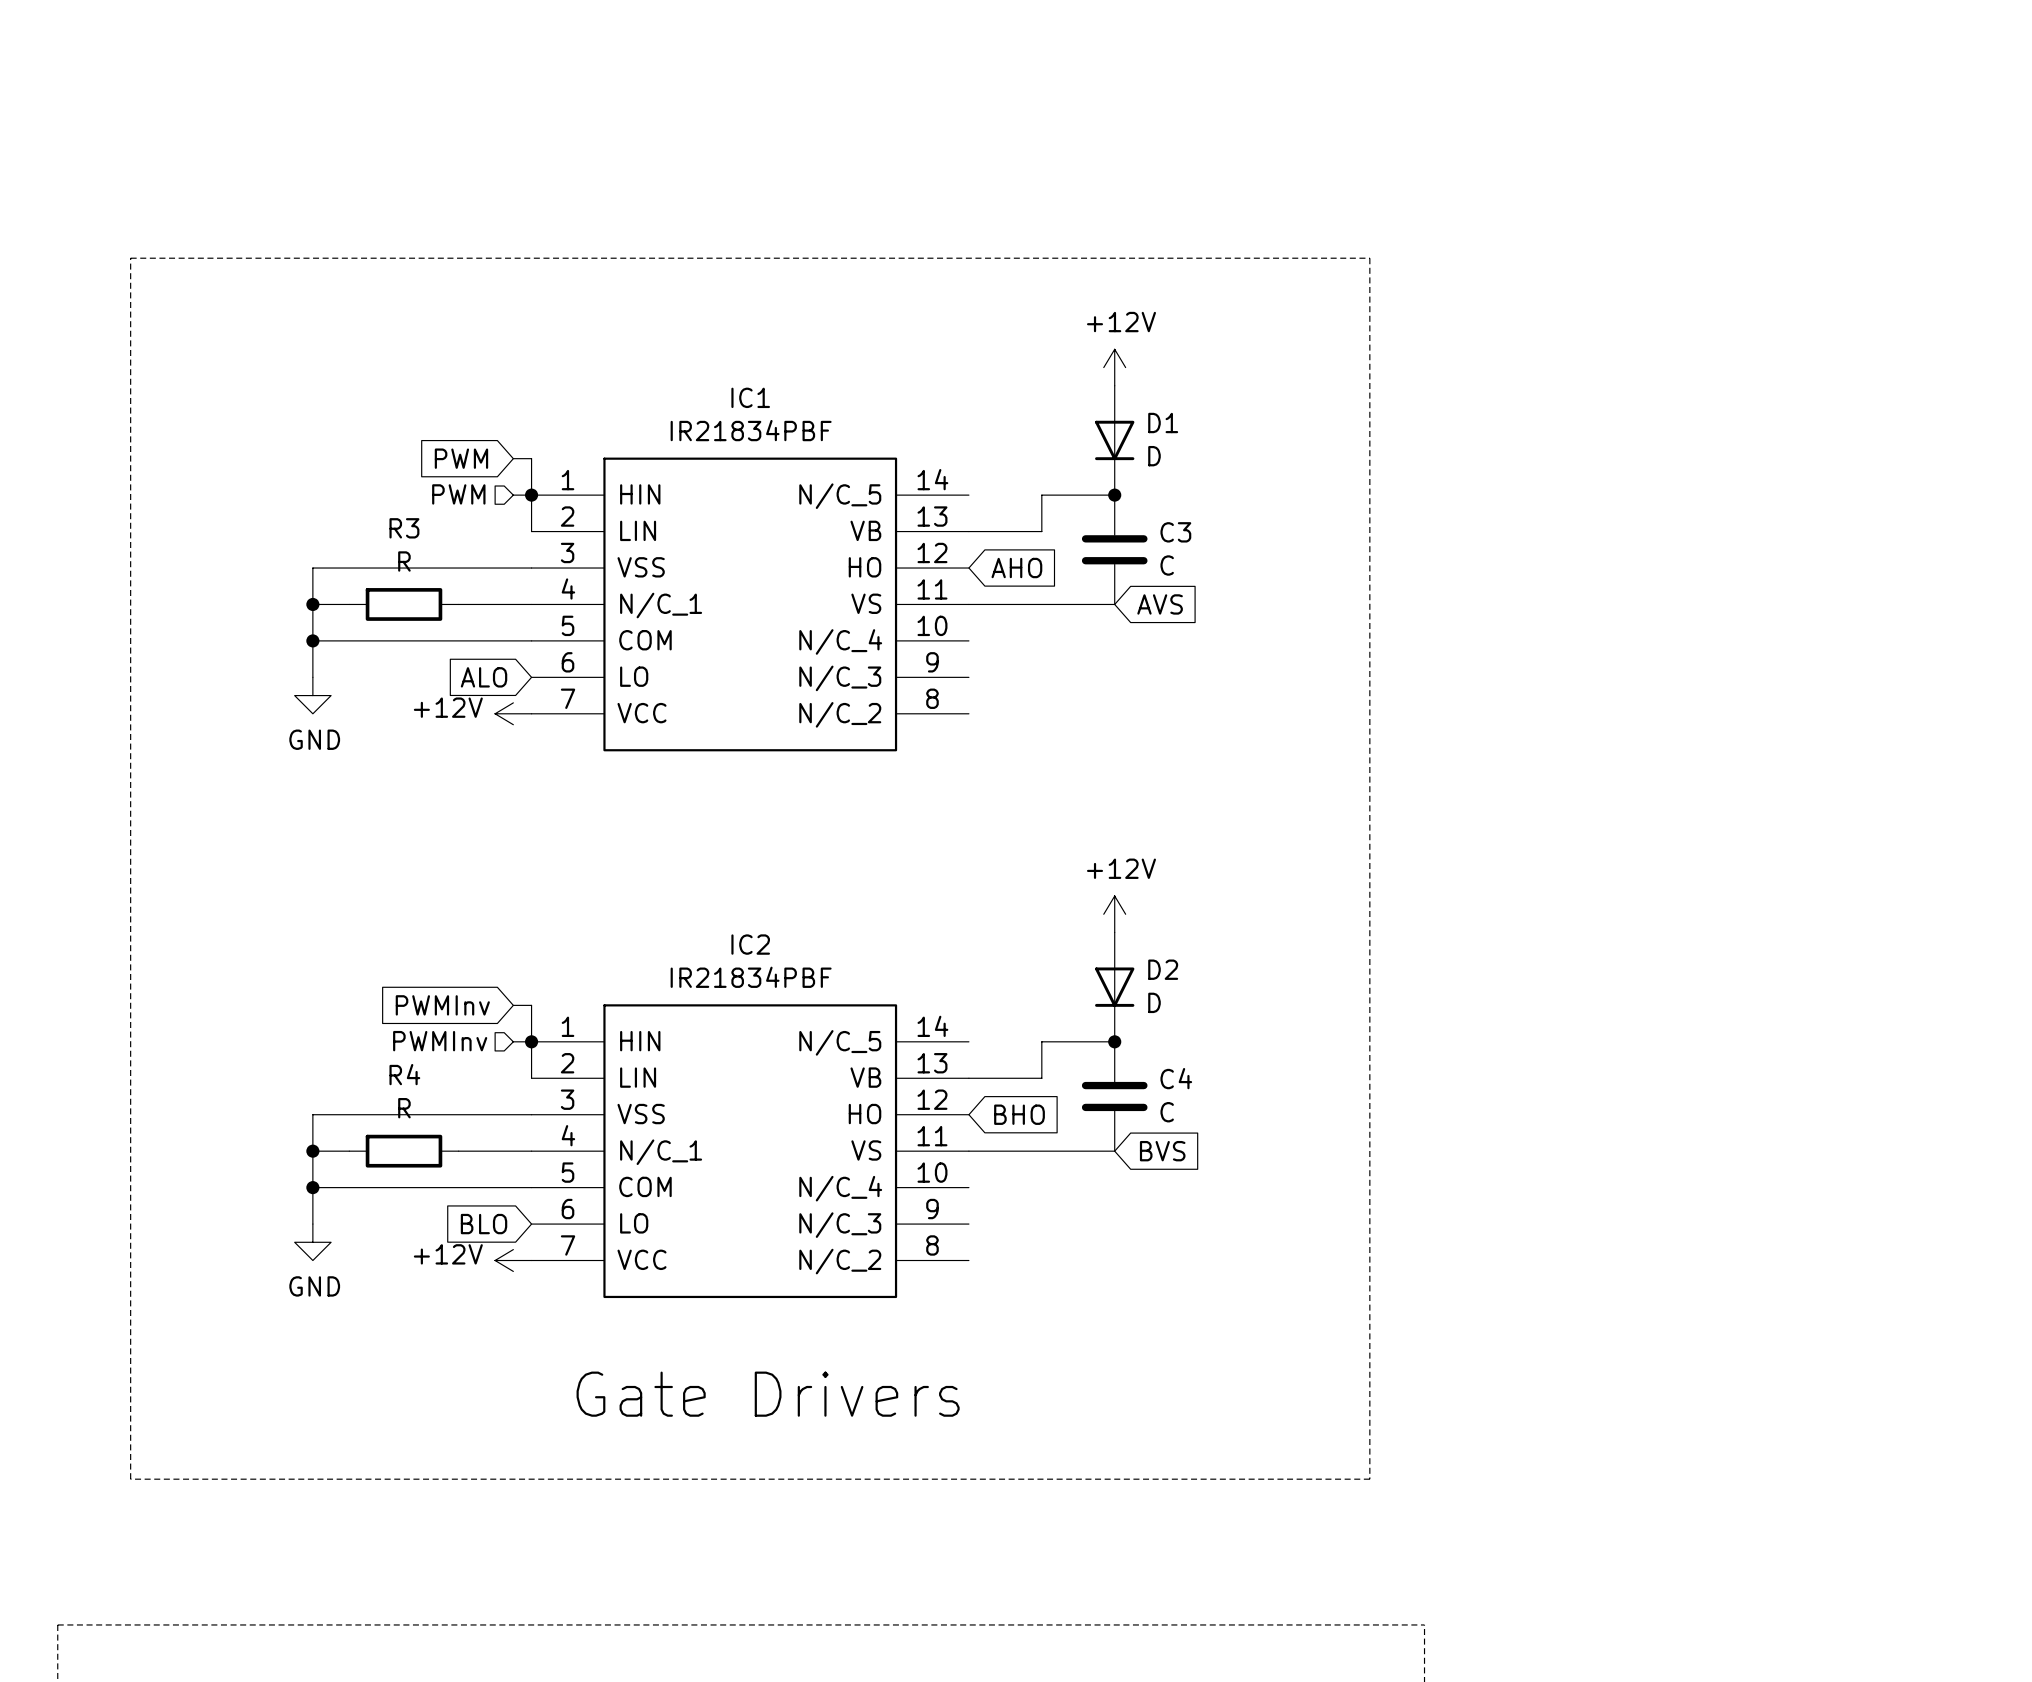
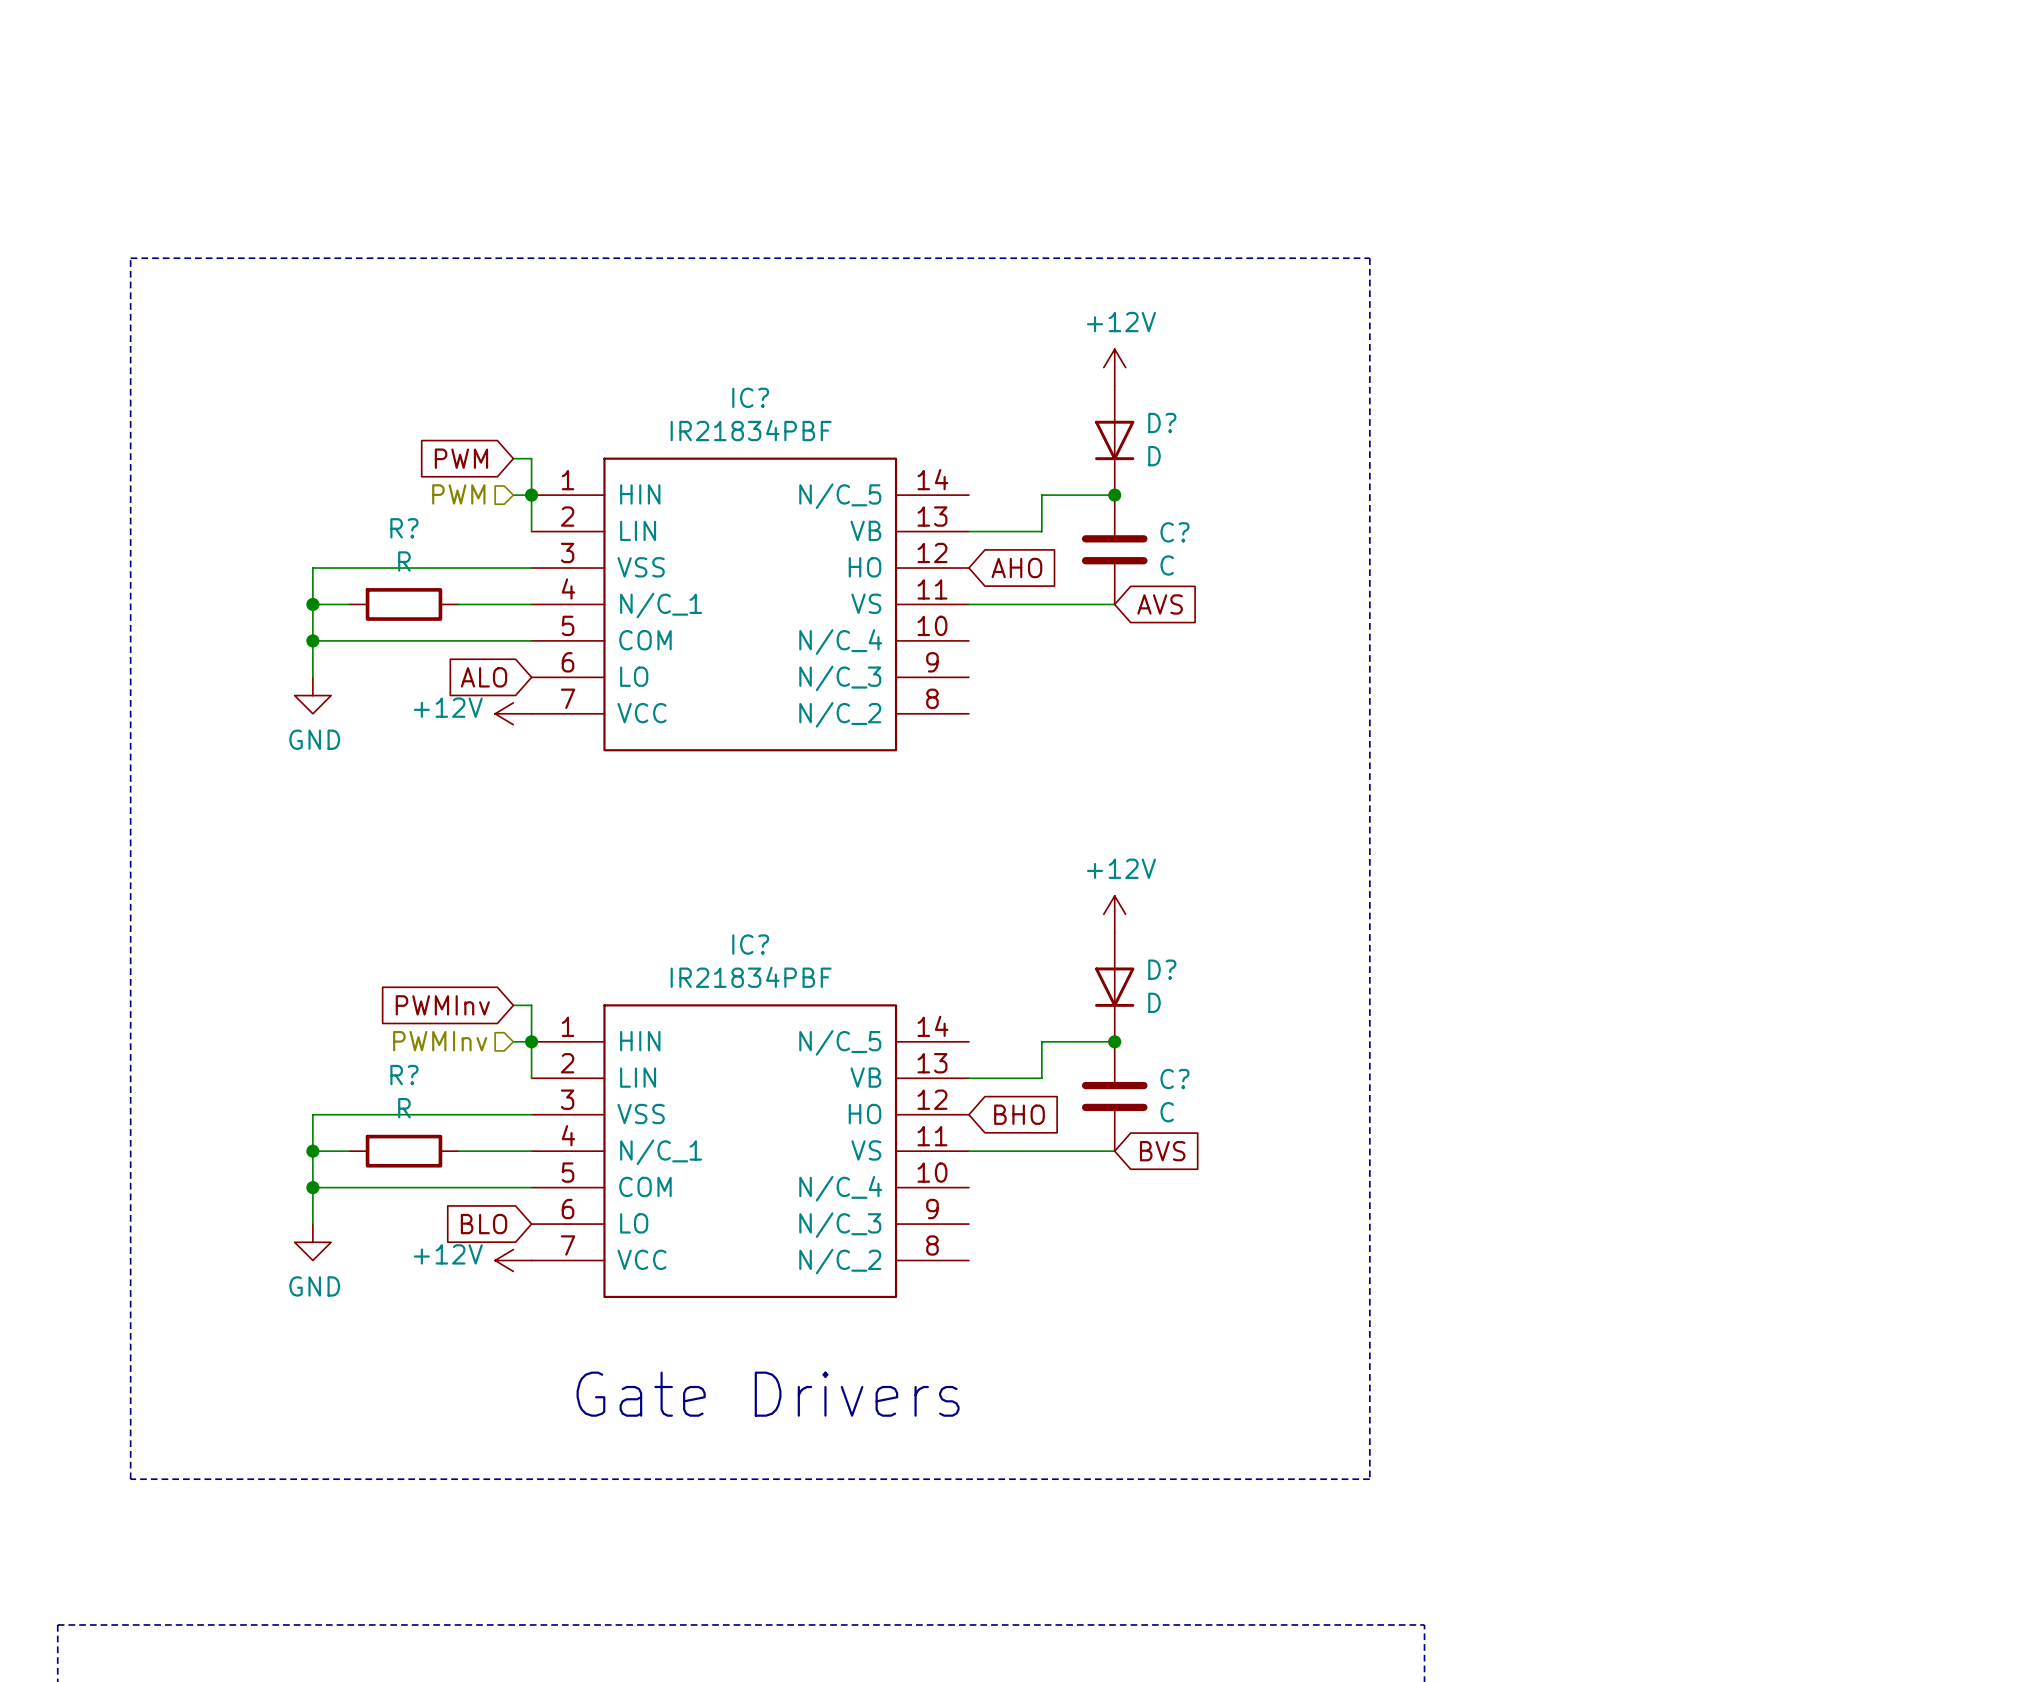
IC1 name: IC1 (750, 397) -> IC? (750, 397)
D1 name: D1 (1163, 423) -> D? (1162, 423)
R3 name: R3 (404, 528) -> R? (404, 528)
C3 name: C3 (1175, 532) -> C? (1174, 532)
IC2 name: IC2 (750, 944) -> IC? (750, 944)
D2 name: D2 (1163, 969) -> D? (1162, 969)
R4 name: R4 (404, 1074) -> R? (404, 1075)
C4 name: C4 (1176, 1078) -> C? (1174, 1079)

